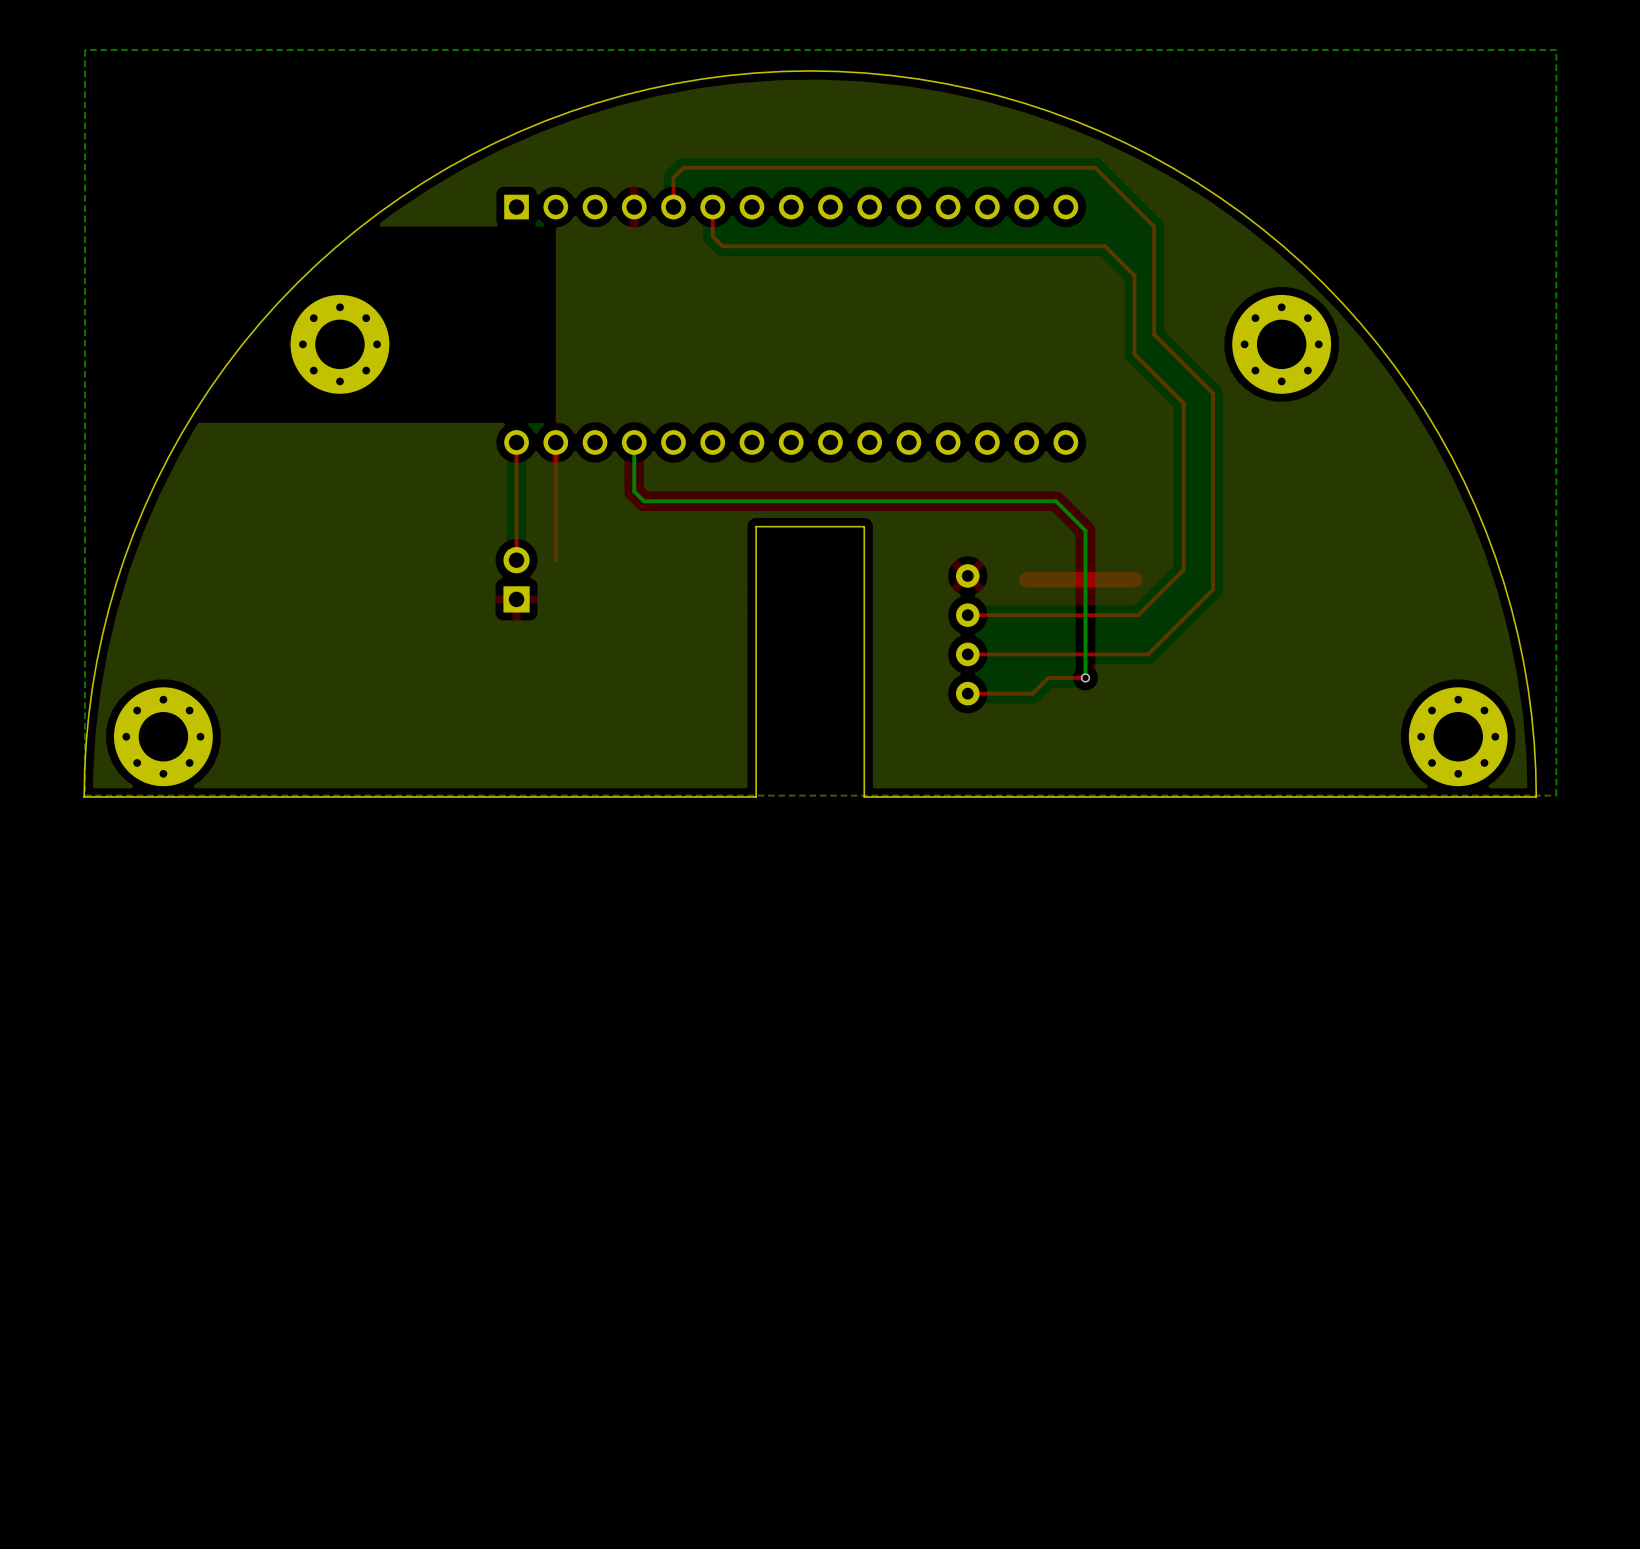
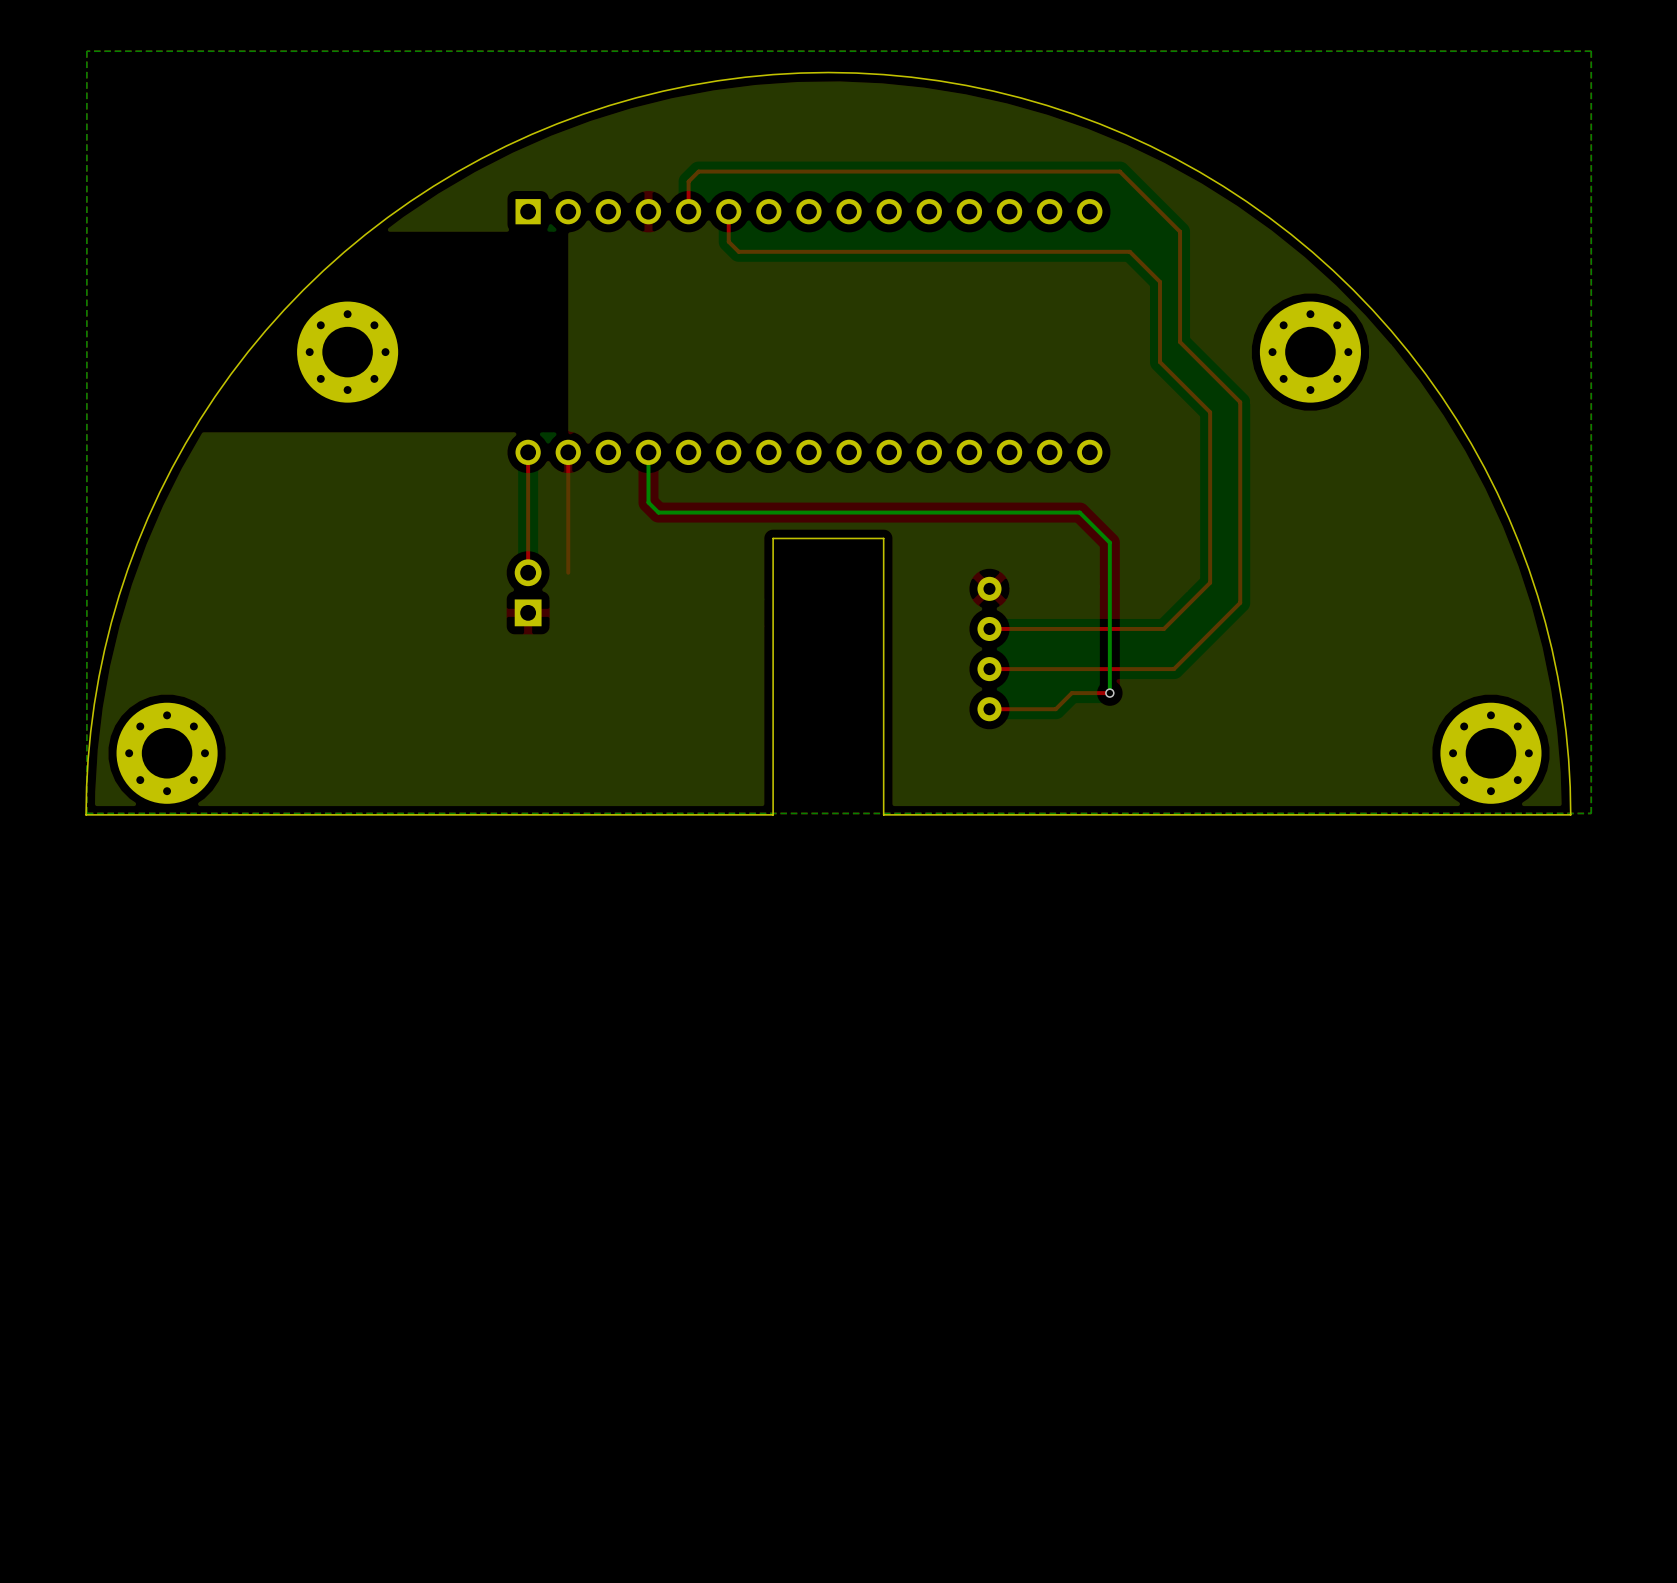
top track: (1134, 579) (1026, 579) -> none

